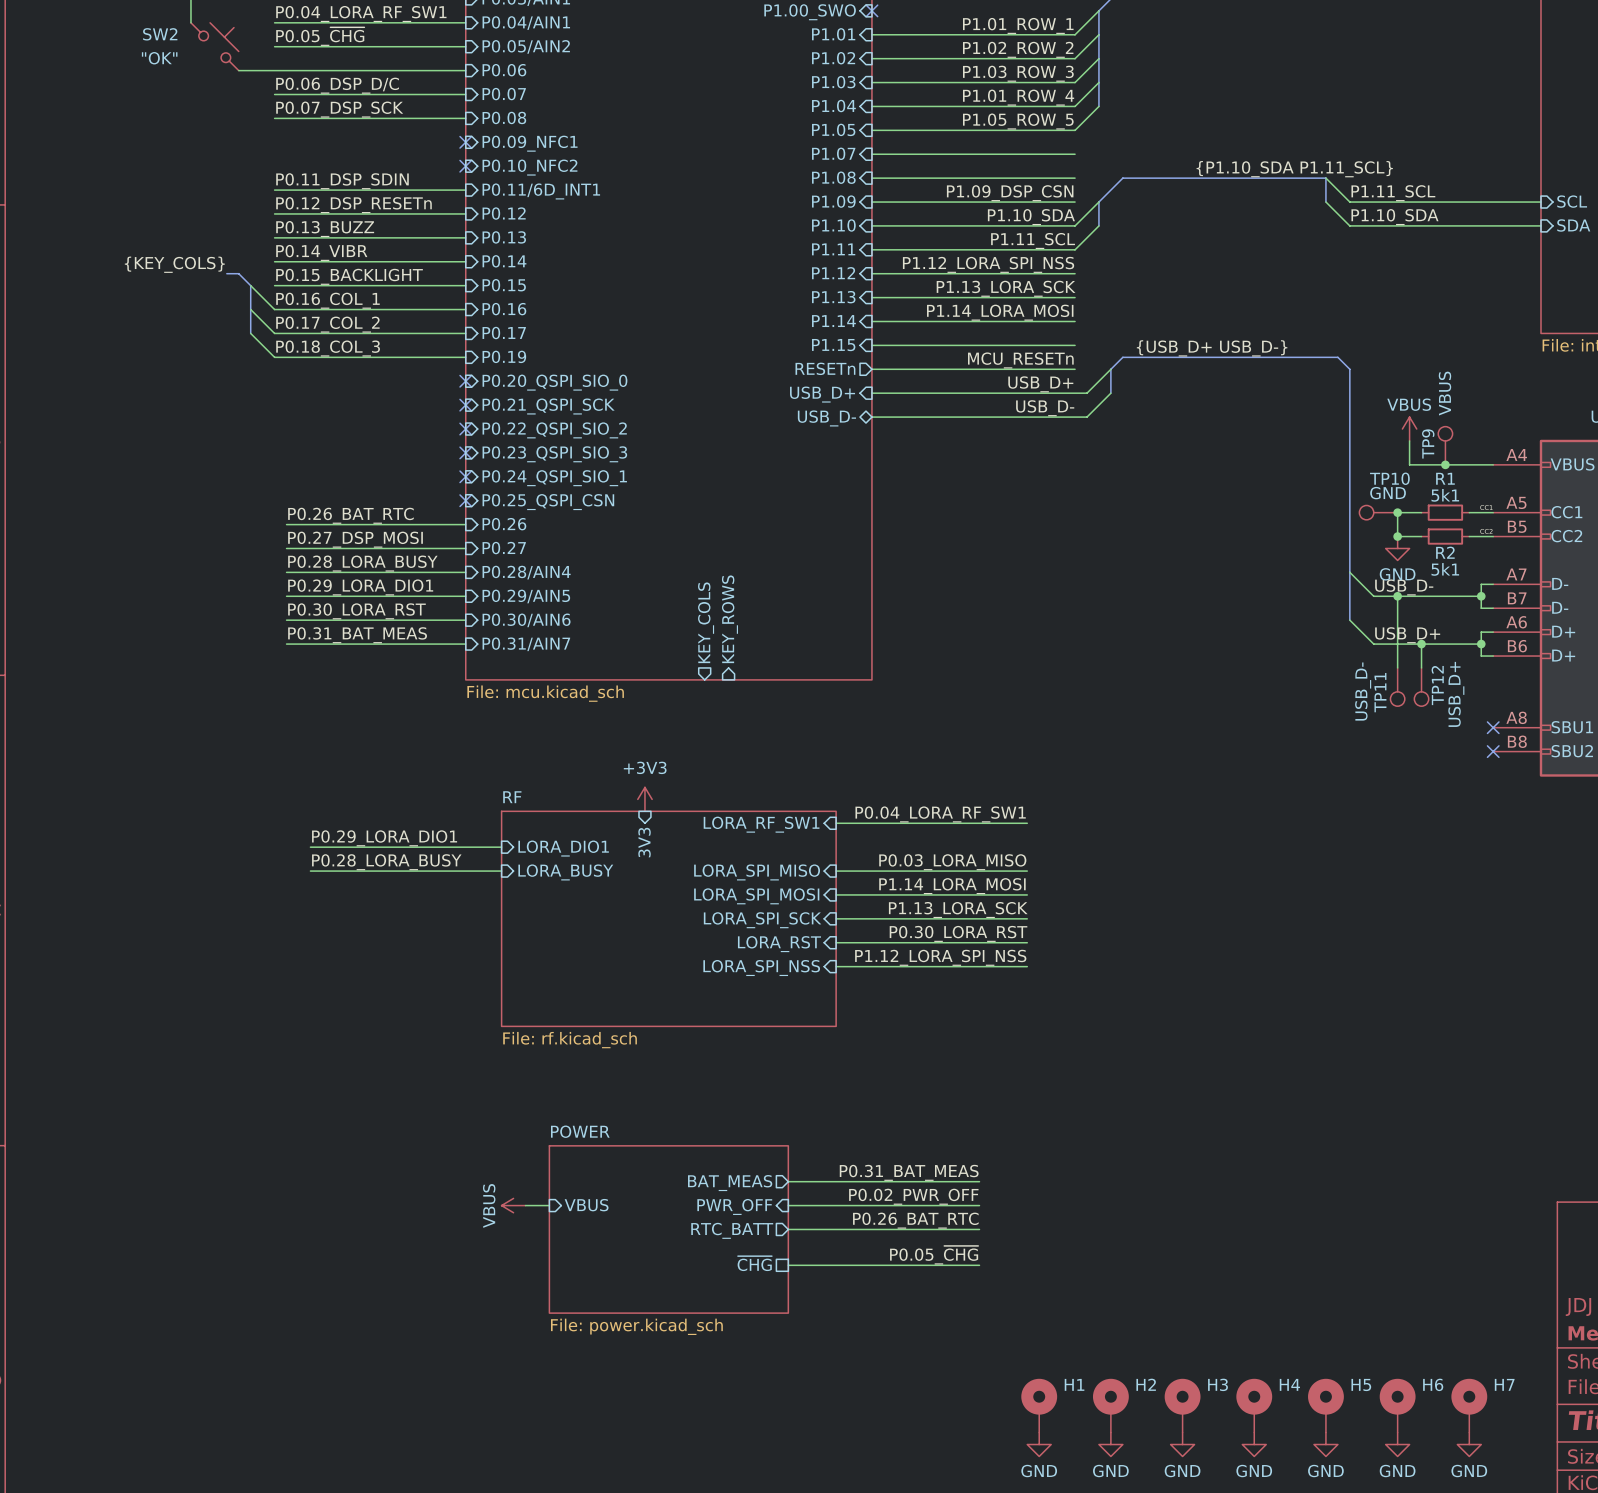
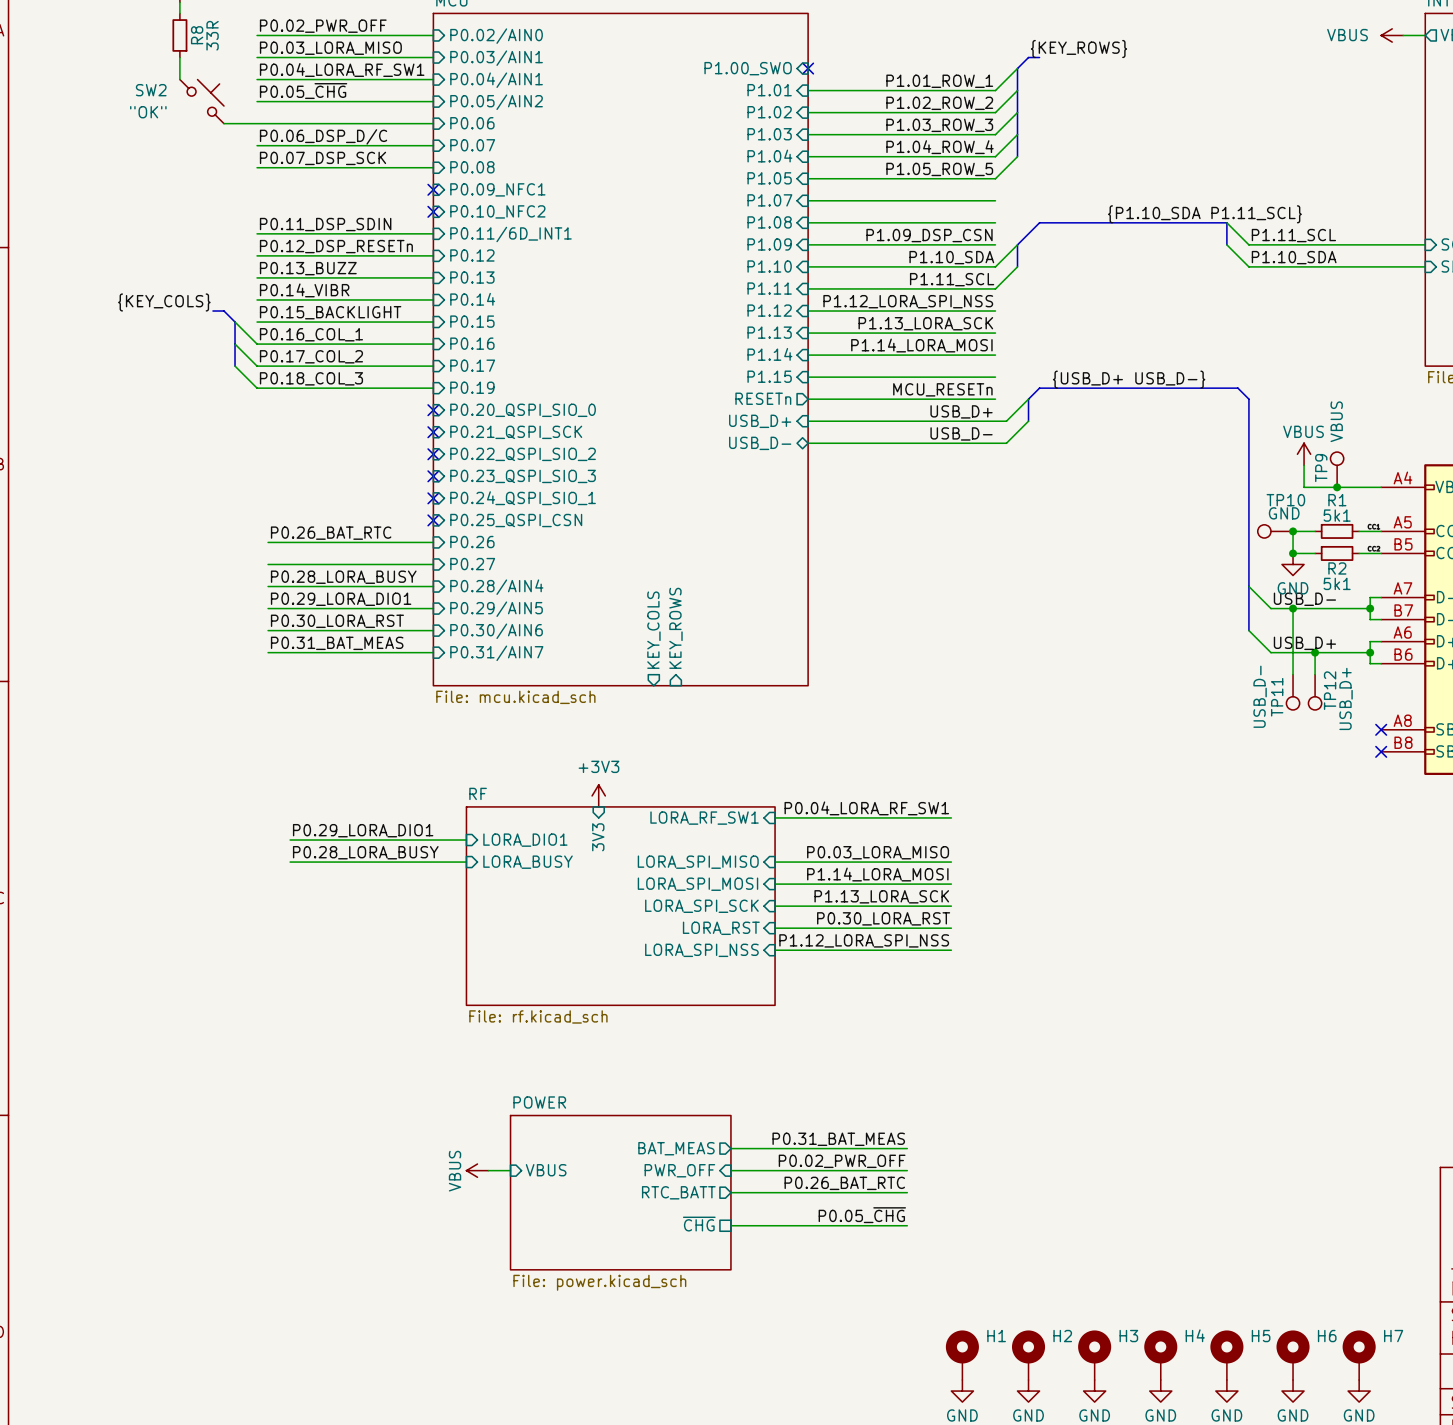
label: P1.01_ROW_4 (1018, 97) -> P1.04_ROW_4 (940, 147)
label: P0.27_DSP_MOSI (355, 539) -> none

